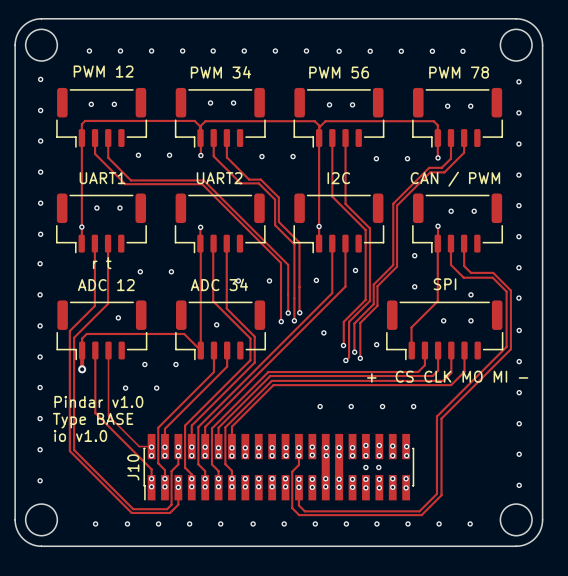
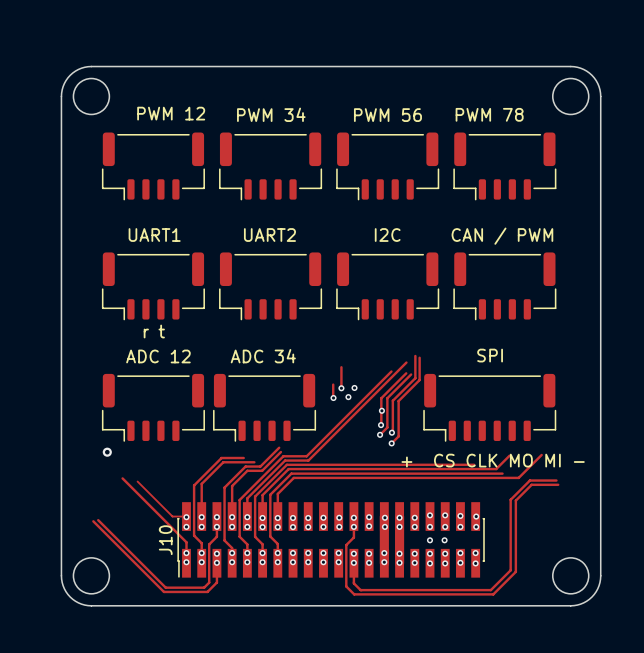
board edge: (41, 18) (516, 18) (524, 20) (534, 26) (539, 33) (542, 45) (542, 519) (539, 531) (534, 538) (524, 544) (516, 546) (41, 546) (30, 543) (22, 538) (16, 528) (15, 519) (15, 45) (16, 36) (22, 26) (32, 20) (41, 18) -> (91, 66) (81, 68) (70, 75) (63, 86) (61, 96) (61, 575) (64, 588) (70, 597) (81, 604) (91, 605) (570, 605) (583, 602) (591, 597) (597, 588) (600, 575) (600, 96) (599, 86) (591, 75) (583, 69) (570, 66) (91, 66)
round board edge position: (41, 45) -> (91, 96)
round board edge position: (516, 45) -> (570, 96)
via: (89, 51) -> none
via: (120, 51) -> none
via: (151, 51) -> none
via: (182, 51) -> none
via: (213, 51) -> none
via: (244, 51) -> none
via: (275, 51) -> none
via: (306, 51) -> none
via: (339, 51) -> none
via: (370, 51) -> none
via: (401, 51) -> none
via: (432, 51) -> none
via: (462, 51) -> none
part value position: PWM 12 (103, 71) -> PWM 12 (171, 113)
part value position: PWM 78 (459, 72) -> PWM 78 (489, 114)
via: (40, 79) -> none
via: (518, 81) -> none
via: (210, 102) -> none
via: (233, 102) -> none
via: (91, 104) -> none
via: (114, 104) -> none
via: (329, 104) -> none
via: (352, 104) -> none
via: (447, 106) -> none
via: (470, 106) -> none
via: (40, 110) -> none
via: (518, 112) -> none
part position: (101, 117) -> (153, 166)
part position: (220, 117) -> (270, 166)
part position: (338, 117) -> (387, 166)
part position: (457, 117) -> (504, 166)
track: (200, 126) (194, 120) (85, 120) (81, 124) (81, 243) -> none
track: (319, 127) (325, 121) (433, 121) (437, 125) (438, 157) -> none
track: (95, 138) (95, 153) (125, 184) (202, 184) (281, 262) (281, 321) -> none
track: (108, 138) (108, 157) (130, 180) (203, 180) (288, 264) (288, 313) -> none
track: (213, 138) (213, 156) (240, 183) (258, 183) (275, 199) (275, 225) (294, 244) (294, 320) -> none
track: (226, 138) (226, 157) (249, 179) (260, 179) (278, 197) (278, 221) (299, 242) (299, 312) -> none
track: (319, 138) (319, 125) (314, 121) (205, 121) (200, 126) (200, 155) -> none
track: (319, 138) (319, 243) -> none
track: (332, 138) (332, 196) (365, 230) (365, 299) (343, 321) (343, 345) -> none
track: (345, 138) (345, 203) (369, 228) (369, 300) (349, 321) -> none
track: (450, 138) (450, 158) (441, 167) (429, 167) (393, 203) (393, 265) (373, 284) (373, 304) (354, 323) (354, 352) -> none
track: (464, 138) (464, 152) (444, 172) (430, 172) (397, 205) (397, 266) (377, 286) (377, 305) (360, 322) (360, 358) -> none
via: (40, 141) -> none
via: (518, 143) -> none
via: (138, 155) -> none
via: (169, 155) -> none
via: (200, 155) -> none
via: (261, 156) -> none
via: (293, 156) -> none
via: (438, 157) -> none
via: (376, 158) -> none
via: (407, 158) -> none
via: (40, 172) -> none
via: (518, 175) -> none
via: (40, 203) -> none
via: (518, 205) -> none
via: (96, 208) -> none
via: (119, 208) -> none
via: (451, 211) -> none
via: (474, 211) -> none
part position: (101, 223) -> (153, 286)
part position: (220, 223) -> (270, 286)
part position: (338, 223) -> (387, 286)
part position: (457, 223) -> (504, 286)
via: (319, 226) -> none
track: (438, 226) (437, 301) (411, 327) (411, 350) -> none
via: (438, 226) -> none
via: (81, 227) -> none
track: (200, 227) (200, 350) (184, 333) (86, 333) (82, 338) (82, 369) -> none
via: (200, 227) -> none
via: (40, 234) -> none
via: (518, 236) -> none
track: (94, 243) (94, 306) (69, 331) (69, 451) -> (93, 521) (93, 521)
track: (108, 243) (108, 303) (74, 337) (74, 450) -> (98, 520) (98, 520)
track: (213, 243) (213, 301) (250, 338) (250, 360) (185, 425) -> (279, 447) (260, 466) (245, 466) (224, 487) (224, 492)
track: (226, 243) (226, 308) (254, 336) (254, 362) (191, 425) -> (280, 452) (262, 470) (247, 470) (232, 486) (232, 492)
track: (332, 243) (332, 293) (198, 427) (198, 432) -> (391, 371) (306, 456) (283, 456) (239, 500)
track: (345, 243) (345, 286) (205, 426) (205, 430) -> (406, 362) (308, 460) (285, 460) (247, 498)
track: (450, 243) (450, 264) (463, 277) (492, 277) (506, 291) (506, 346) (436, 416) (436, 431) -> (556, 480) (529, 480) (510, 499)
track: (464, 243) (464, 266) (470, 272) (493, 272) (510, 290) (510, 349) (441, 418) (441, 432) -> (558, 484) (531, 484) (515, 500)
via: (414, 255) -> none
via: (40, 263) -> none
via: (518, 267) -> none
via: (355, 270) -> none
via: (140, 271) -> none
via: (171, 271) -> none
via: (238, 280) -> none
via: (269, 280) -> none
via: (316, 280) -> none
via: (414, 286) -> none
via: (40, 294) -> none
via: (470, 294) -> none
via: (518, 298) -> none
track: none -> (415, 356) (415, 378) (392, 400) (391, 432)
track: none -> (419, 357) (419, 380) (398, 401) (398, 436) (391, 443)
via: (299, 312) -> none
via: (288, 313) -> none
track: none -> (341, 367) (341, 388)
via: (118, 317) -> none
via: (294, 320) -> none
track: none -> (406, 373) (381, 398) (381, 425)
via: (443, 320) -> none
via: (470, 320) -> none
via: (281, 321) -> none
track: (349, 321) (349, 357) (345, 360) -> (410, 374) (387, 398) (387, 427) (380, 434)
via: (216, 324) -> none
via: (40, 325) -> none
part position: (101, 330) -> (153, 407)
part position: (220, 330) -> (264, 407)
track: none -> (333, 384) (333, 398)
part position: (444, 330) -> (489, 407)
via: (519, 330) -> none
via: (323, 332) -> none
via: none -> (341, 388)
via: none -> (354, 387)
via: none -> (348, 397)
via: none -> (333, 398)
via: (376, 344) -> none
via: (343, 345) -> none
track: (95, 350) (95, 413) -> none
track: (108, 350) (108, 415) -> none
track: (213, 350) (213, 372) (158, 427) -> (243, 458) (221, 458) (194, 485) (194, 495)
track: (227, 350) (227, 366) (164, 428) -> (254, 462) (223, 462) (201, 483) (201, 496)
track: (424, 350) (424, 365) (418, 372) (268, 372) (211, 429) -> (474, 464) (286, 464) (255, 496)
track: (438, 350) (438, 370) (432, 376) (270, 376) (241, 404) -> (509, 455) (496, 469) (288, 469)
track: (451, 350) (451, 372) (443, 380) (271, 380) (243, 408) -> (502, 473) (291, 473)
track: (464, 350) (464, 371) (451, 385) (273, 385) (246, 412) -> (541, 454) (518, 477) (293, 477)
via: (354, 352) -> none
via: none -> (381, 410)
via: (40, 357) -> none
via: (360, 358) -> none
via: (345, 360) -> none
via: (519, 361) -> none
via: (144, 364) -> none
via: (175, 364) -> none
via: none -> (381, 425)
via position: (82, 369) -> (107, 452)
via: none -> (391, 432)
via: none -> (380, 434)
via: none -> (391, 443)
via: (40, 387) -> none
via: (125, 388) -> none
via: (156, 388) -> none
via: (519, 392) -> none
text: Pindar v1.0 (98, 401) -> none
via: (320, 406) -> none
via: (351, 406) -> none
via: (382, 406) -> none
via: (413, 406) -> none
via: (40, 418) -> none
text: Type BASE (93, 420) -> none
via: (519, 423) -> none
text: io v1.0 (80, 435) -> none
via: (40, 449) -> none
via: (519, 454) -> none
via: (40, 480) -> none
via: (519, 485) -> none
round board edge position: (41, 519) -> (91, 575)
round board edge position: (516, 519) -> (570, 575)
via: (95, 523) -> none
via: (127, 523) -> none
via: (158, 523) -> none
via: (189, 523) -> none
via: (220, 523) -> none
via: (253, 523) -> none
via: (284, 523) -> none
via: (315, 523) -> none
via: (346, 523) -> none
via: (376, 523) -> none
via: (408, 523) -> none
via: (439, 523) -> none
via: (470, 523) -> none

